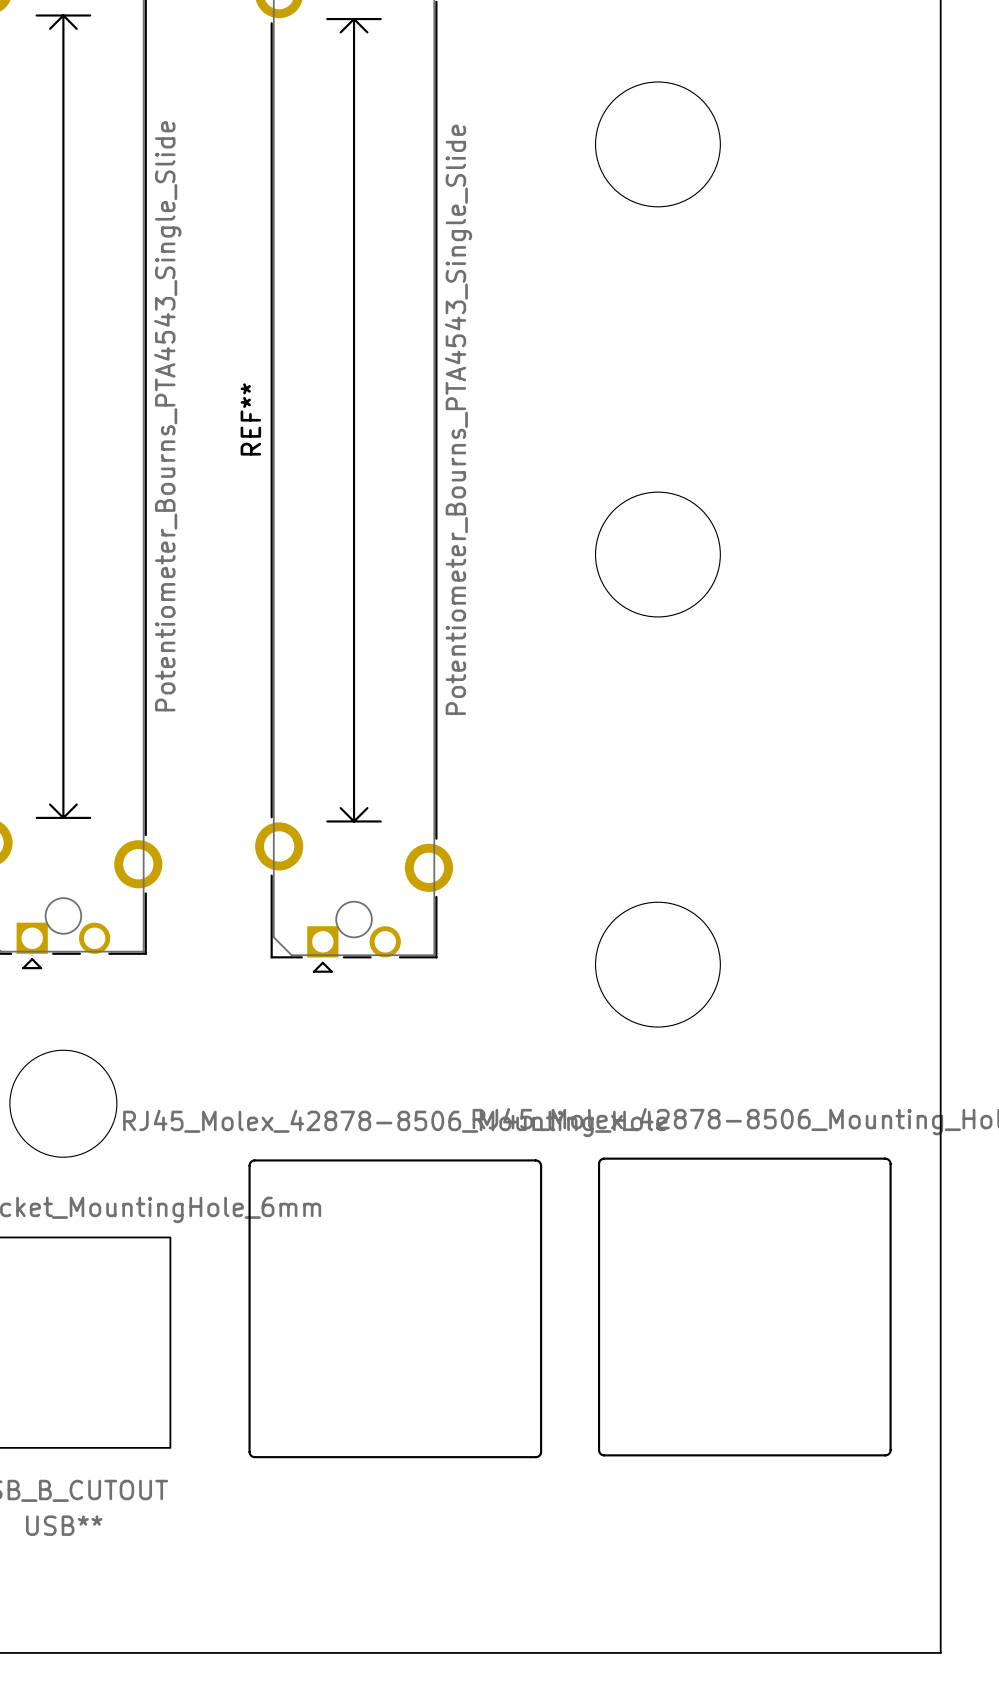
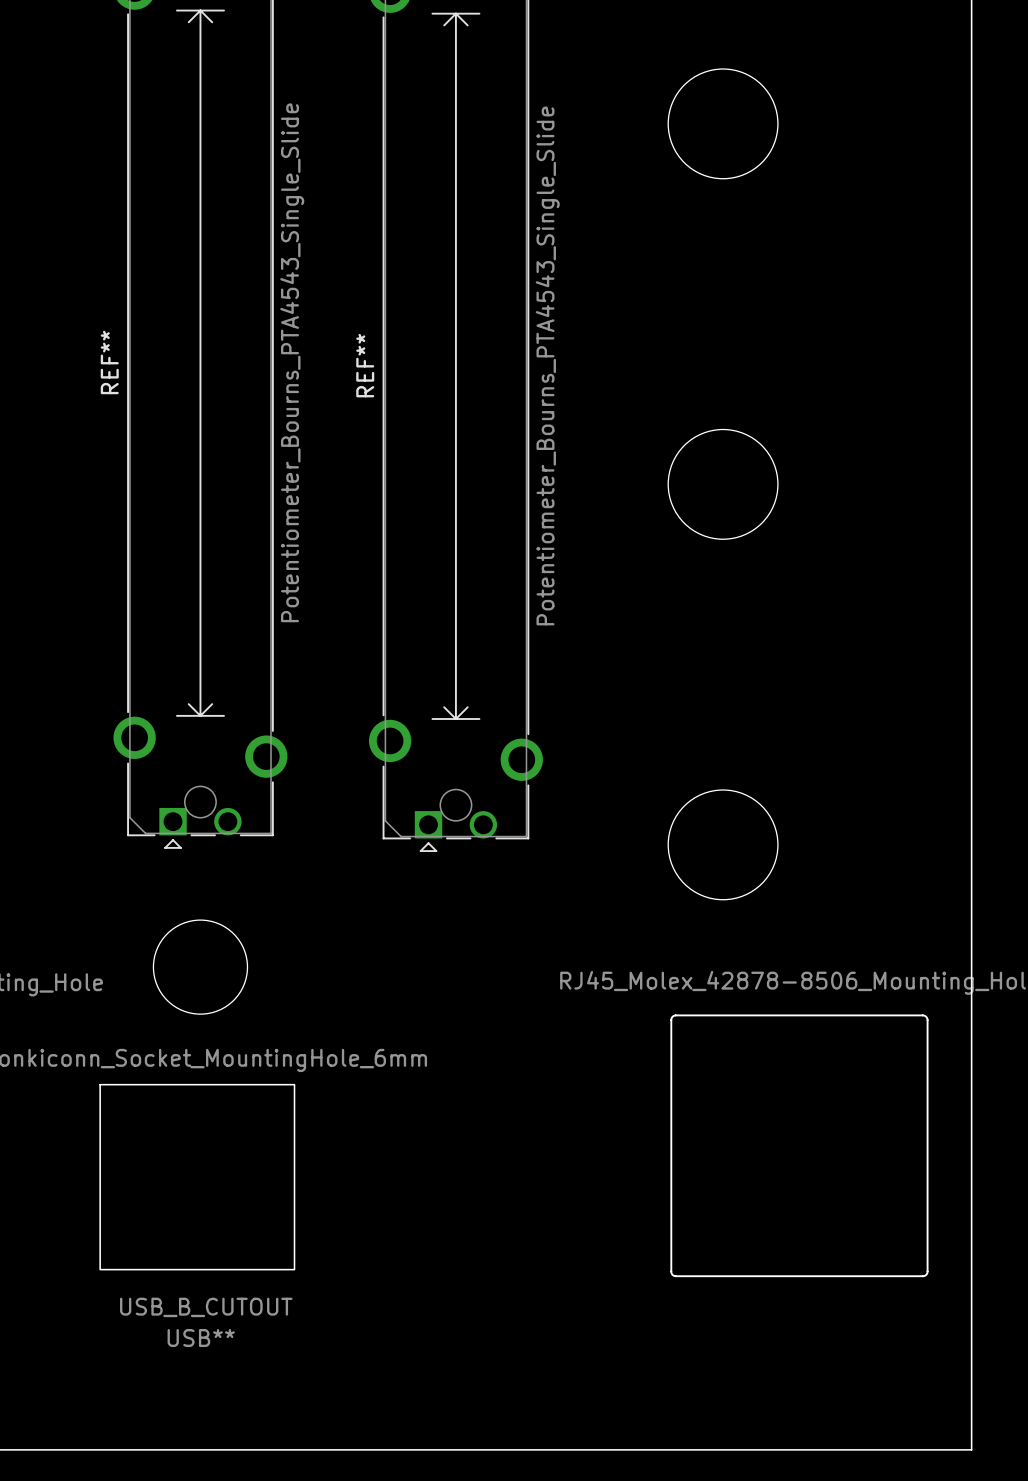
drawing: [248, 1159, 543, 1459] -> none

